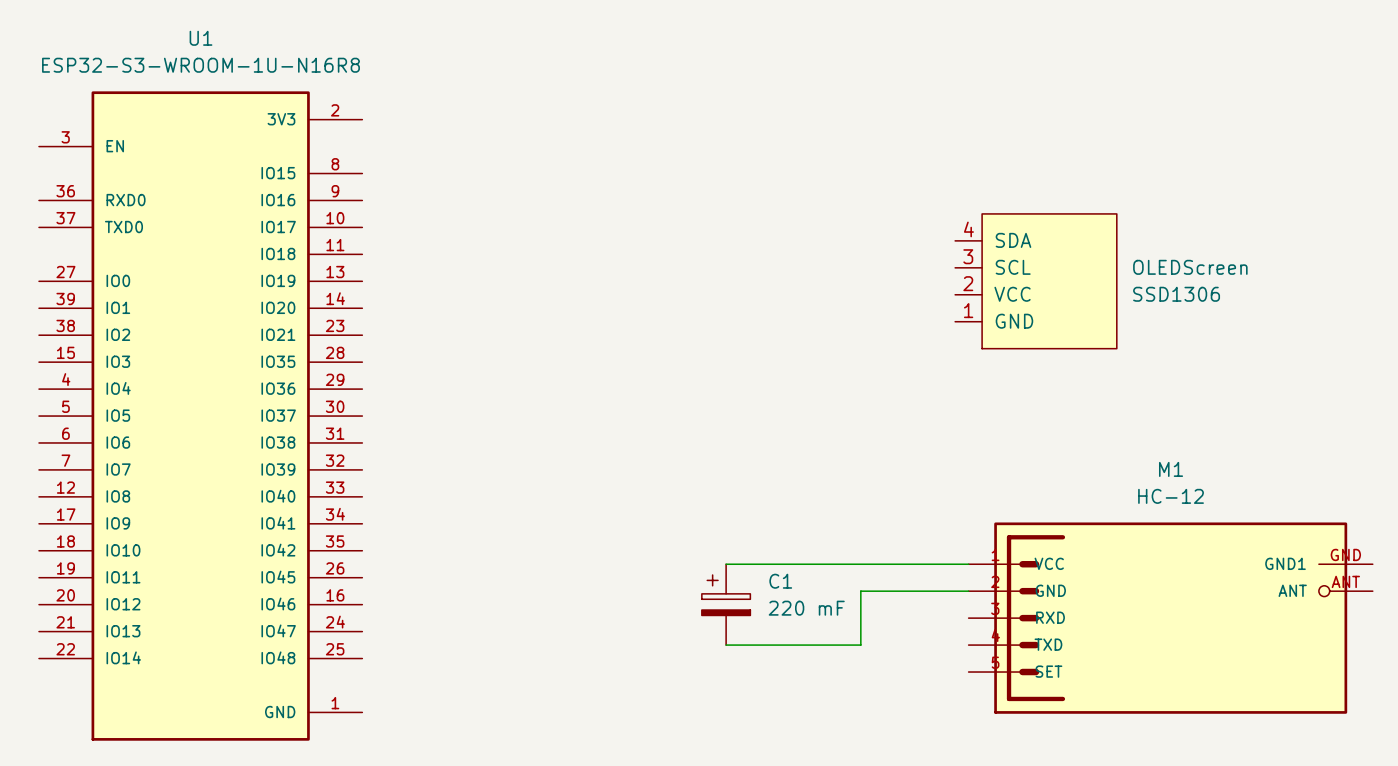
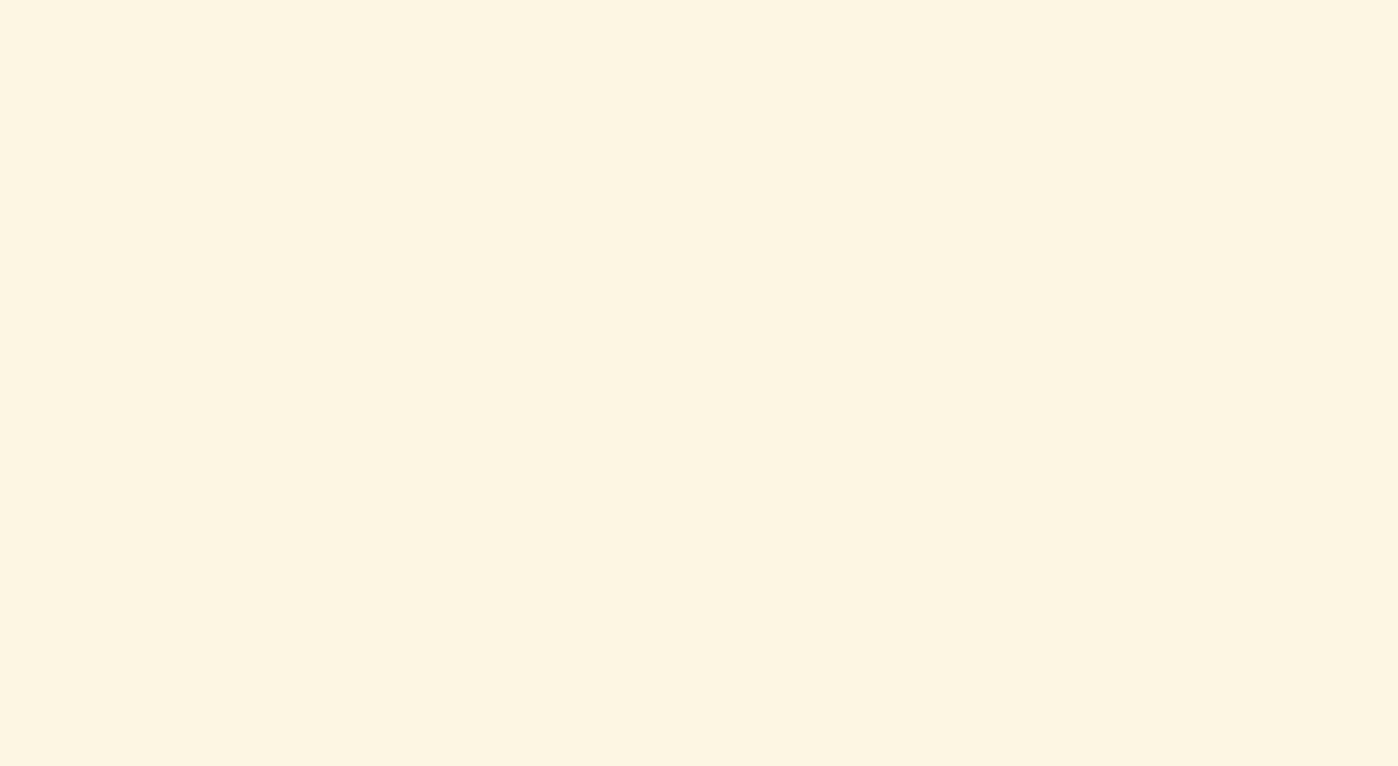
OLEDScreen: SSD1306 (1035, 281) -> none
U1: ESP32-S3-WROOM-1U-N16R8 (200, 416) -> none
wire: (726, 564) (968, 564) -> none
wire: (968, 591) (860, 591) (860, 645) (726, 645) -> none
C1: 220 mF (726, 604) -> none
M1: HC-12 (1170, 618) -> none

